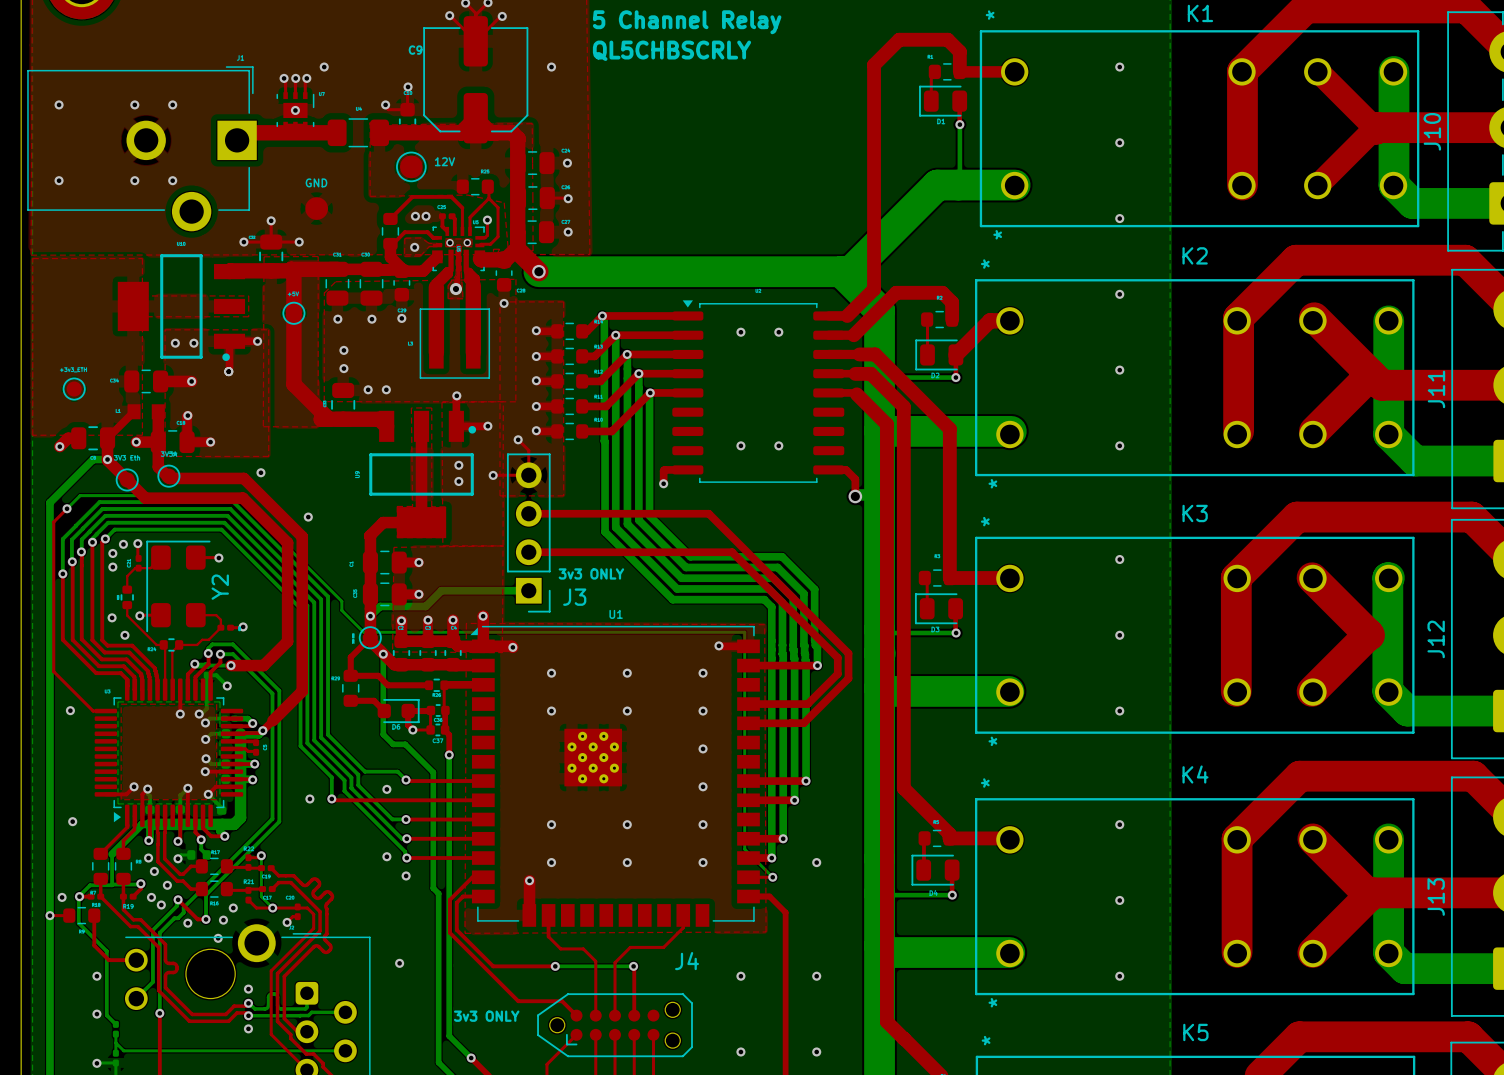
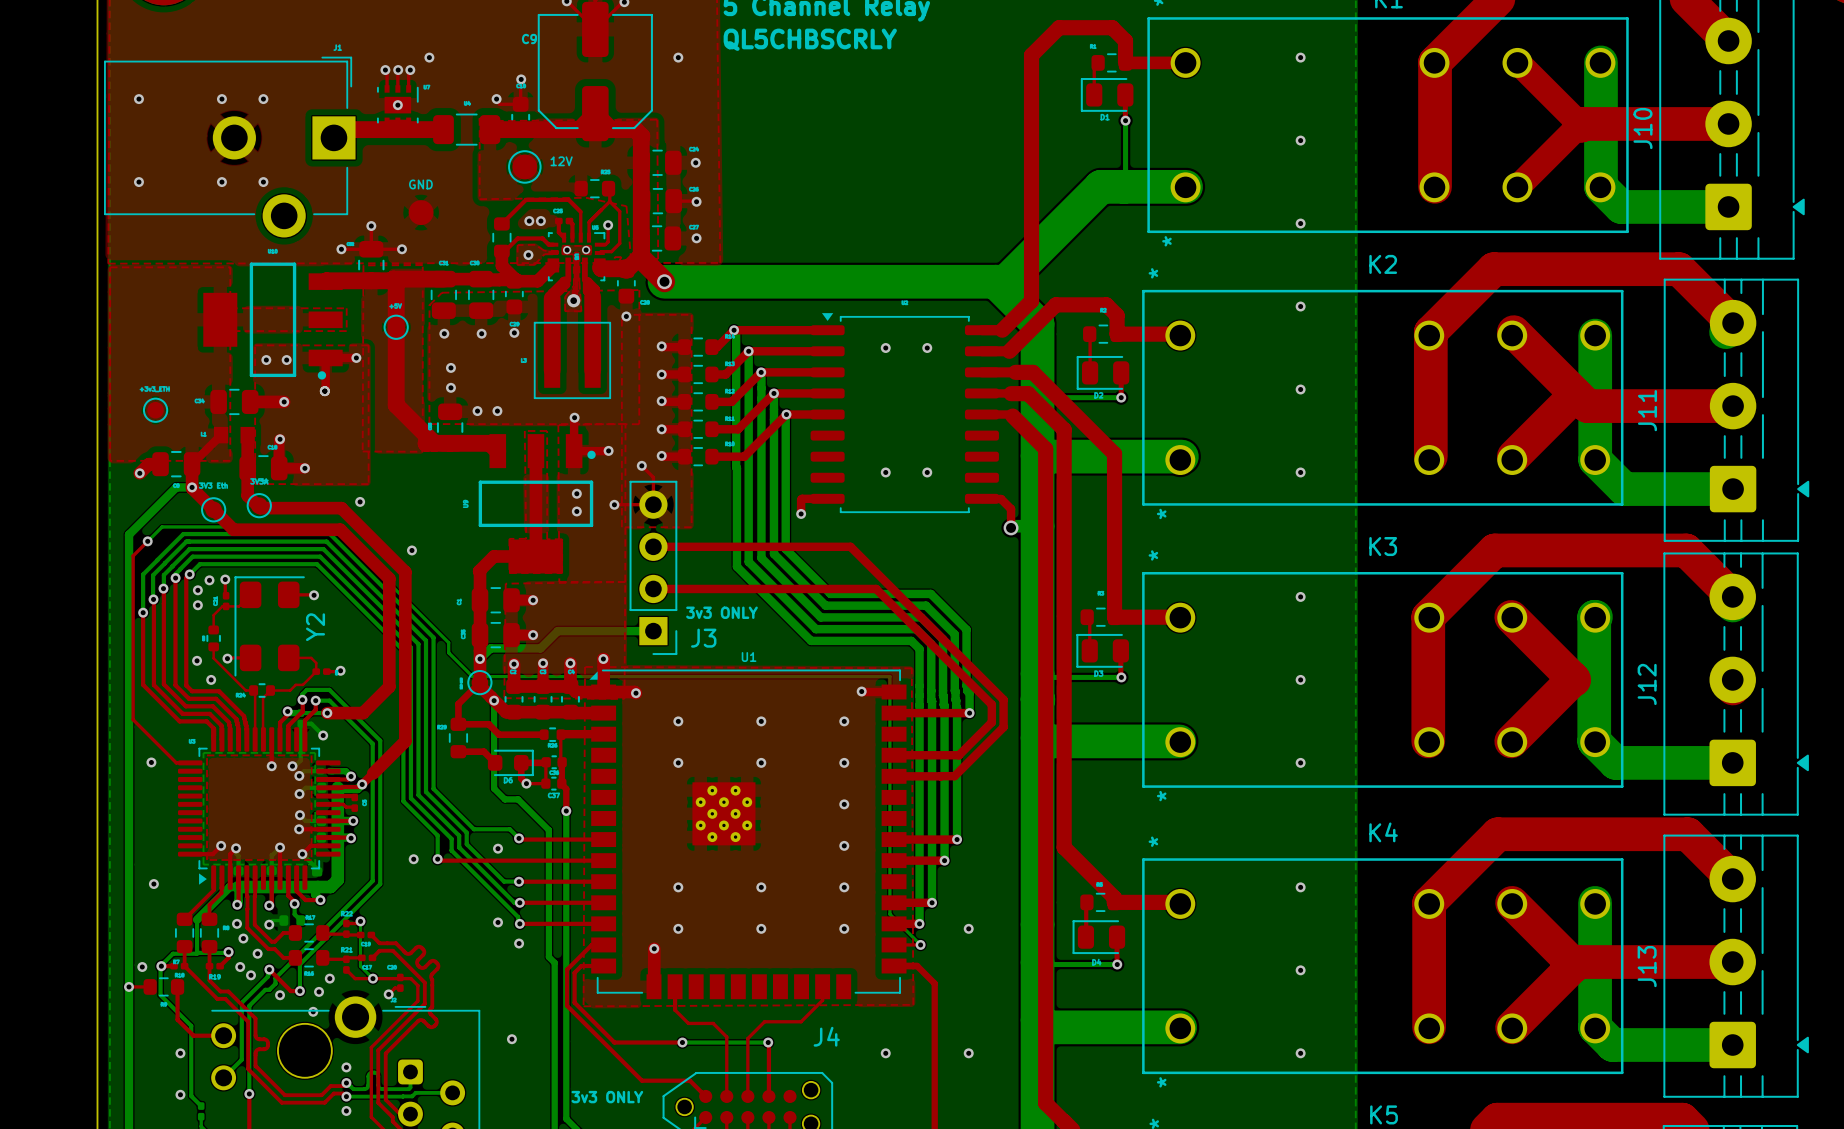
top track: (1009, 320) (990, 320) (955, 354) -> (1180, 335) (1117, 334)
top track: (136, 442) (158, 442) -> none
via: (136, 442) -> none

